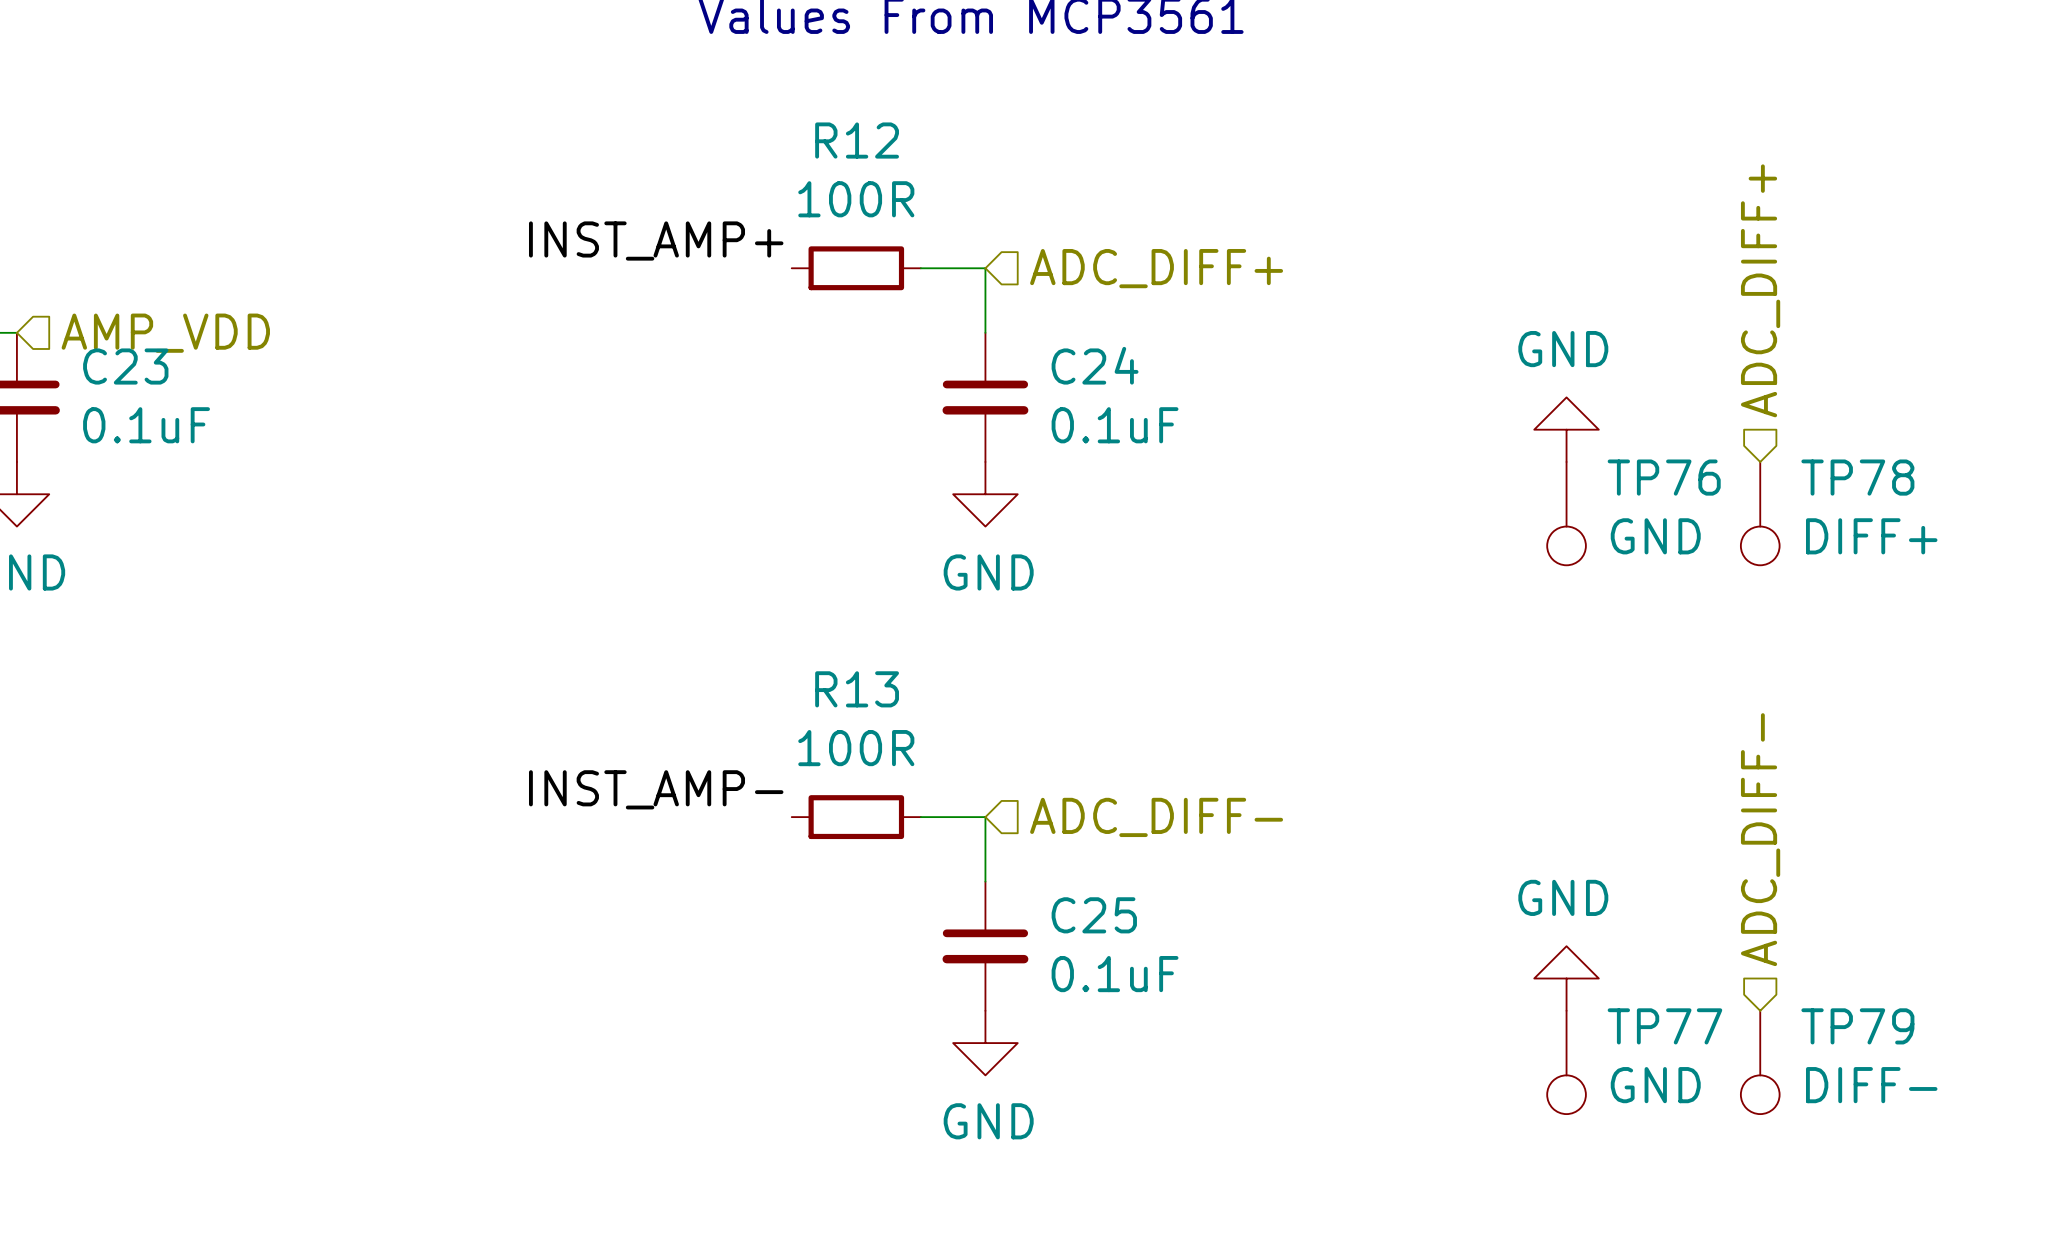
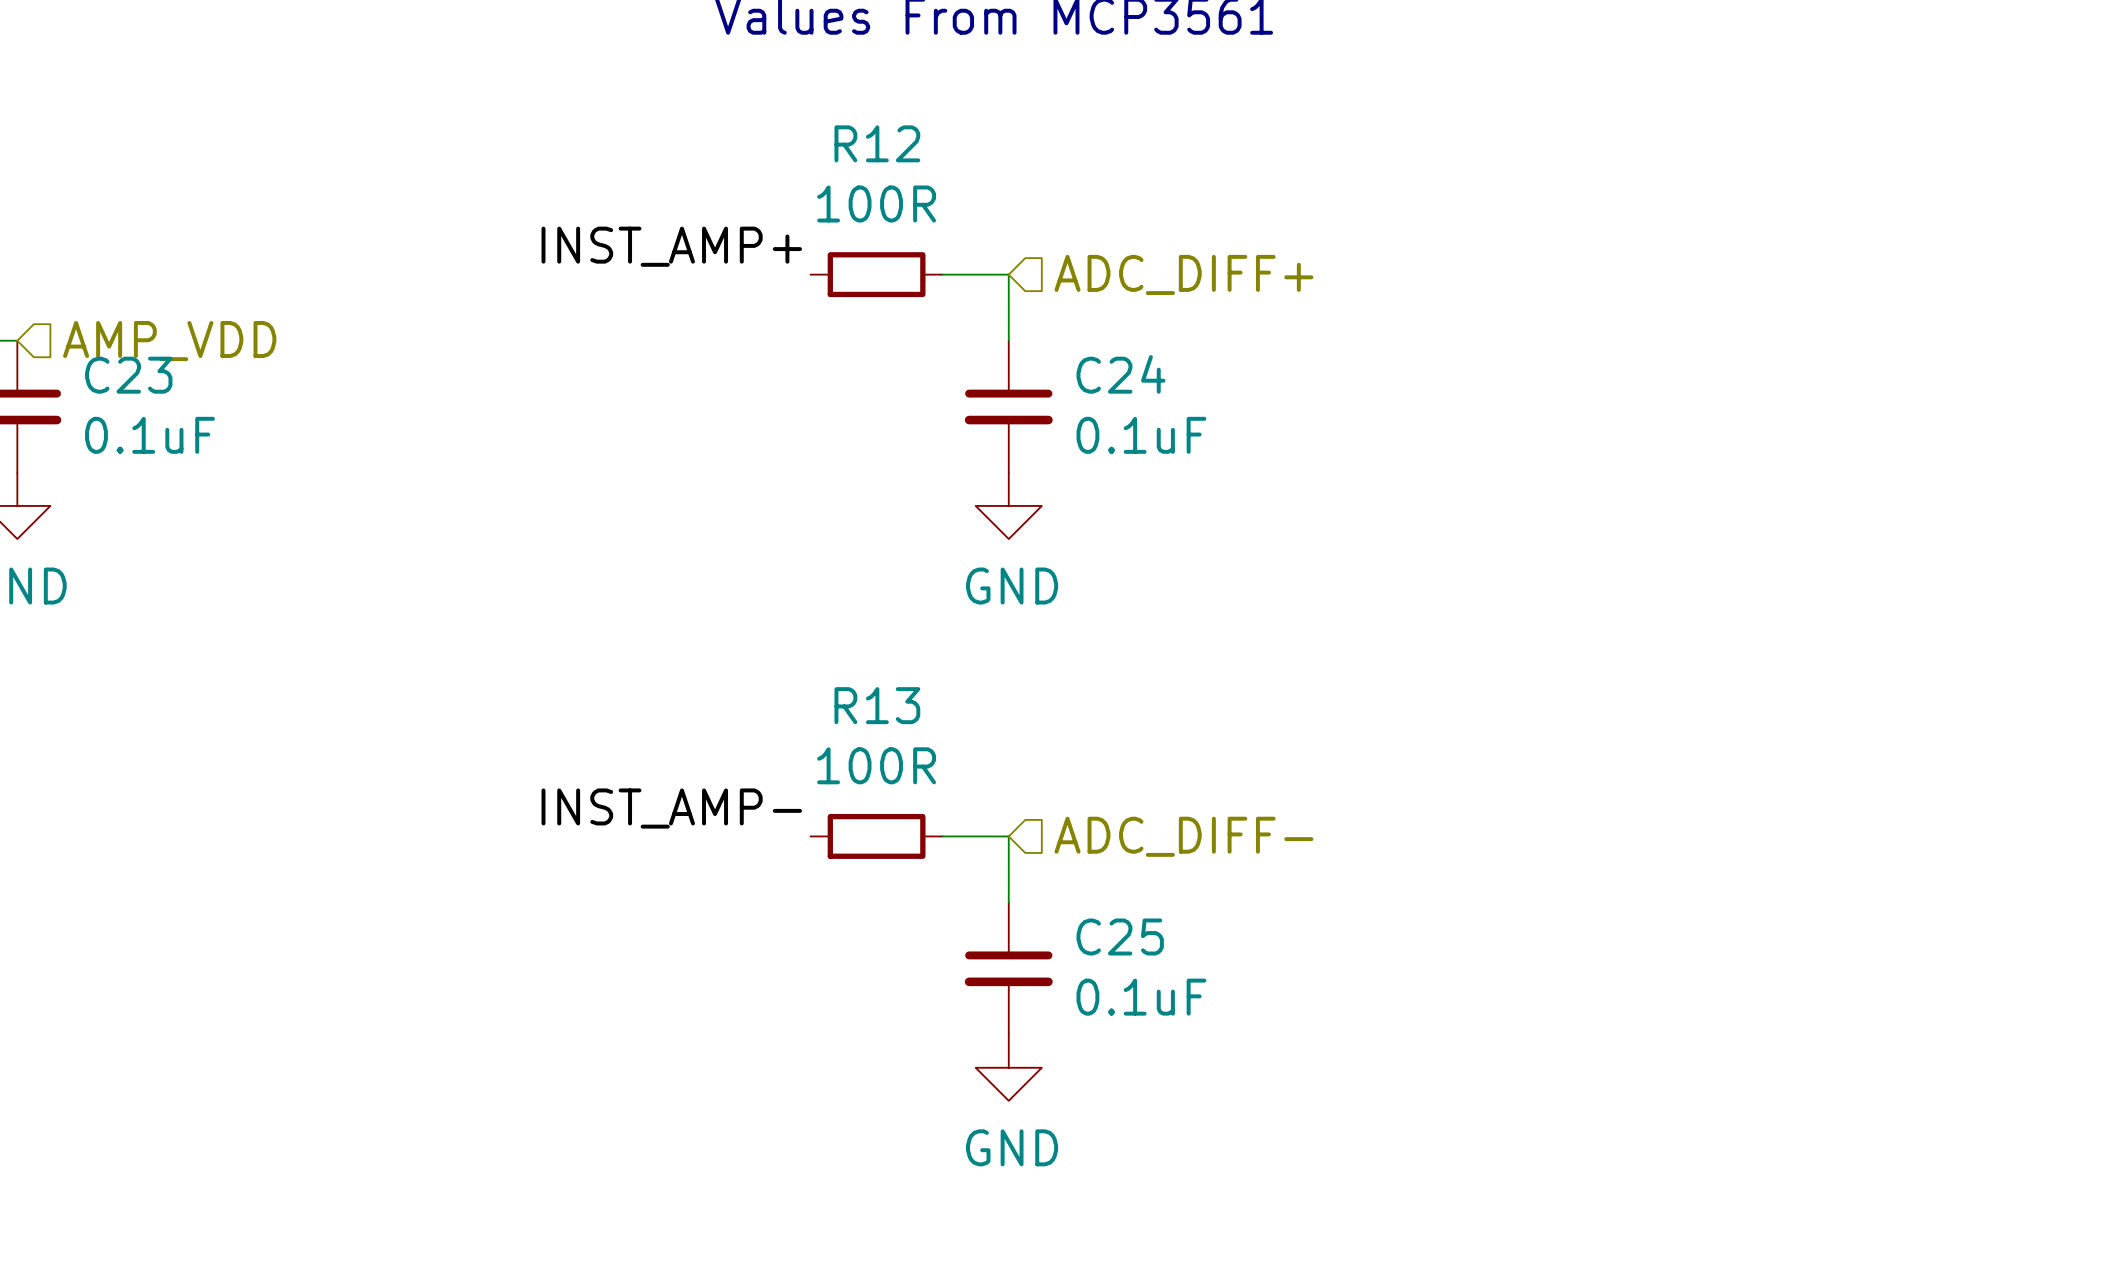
hierarchical label: ADC_DIFF+ (1760, 290) -> none
power symbol: GND (1566, 429) -> none
TP76: GND (1566, 513) -> none
TP78: DIFF+ (1760, 513) -> none
hierarchical label: ADC_DIFF- (1760, 839) -> none
power symbol: GND (1566, 978) -> none
TP77: GND (1566, 1062) -> none
TP79: DIFF- (1760, 1062) -> none

